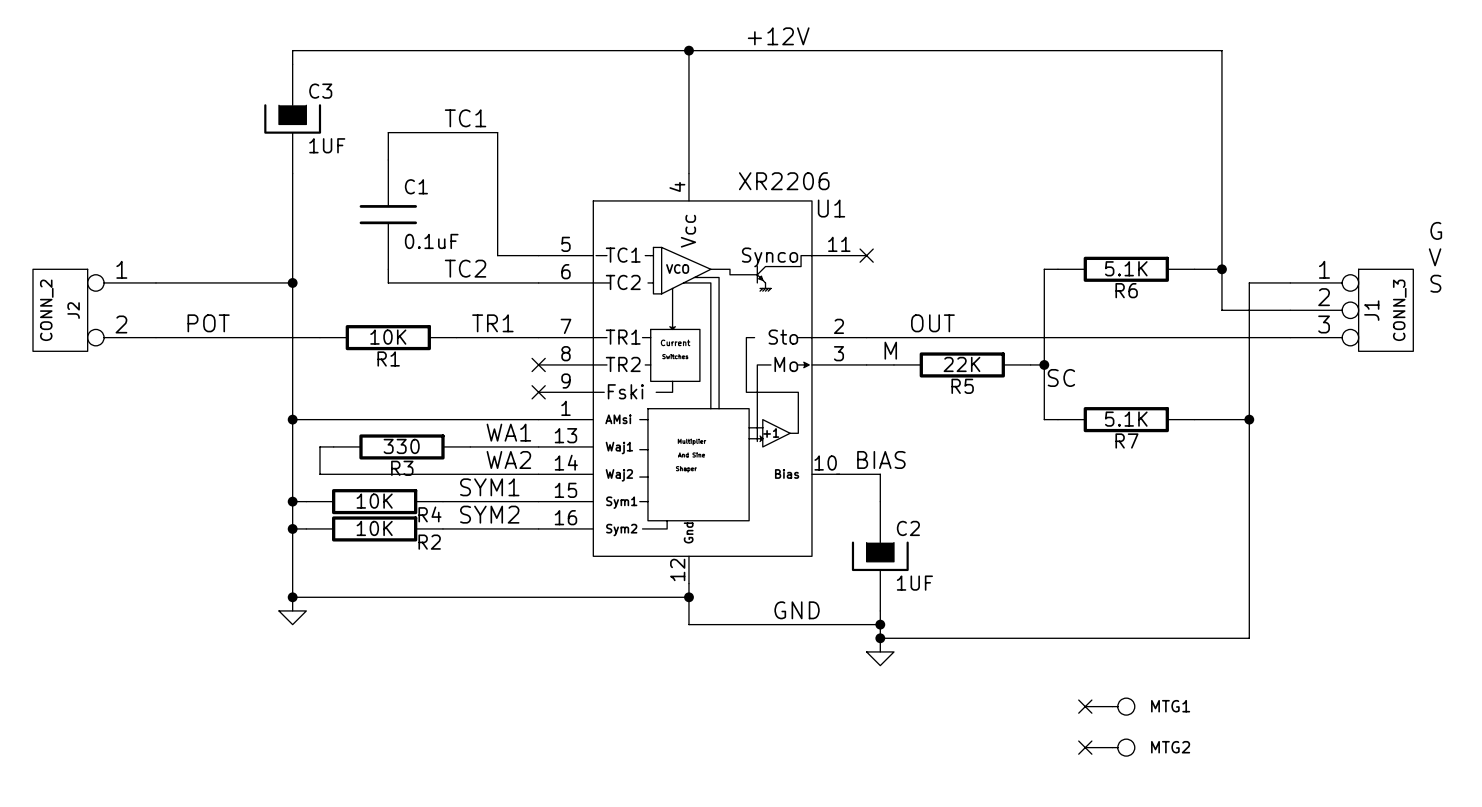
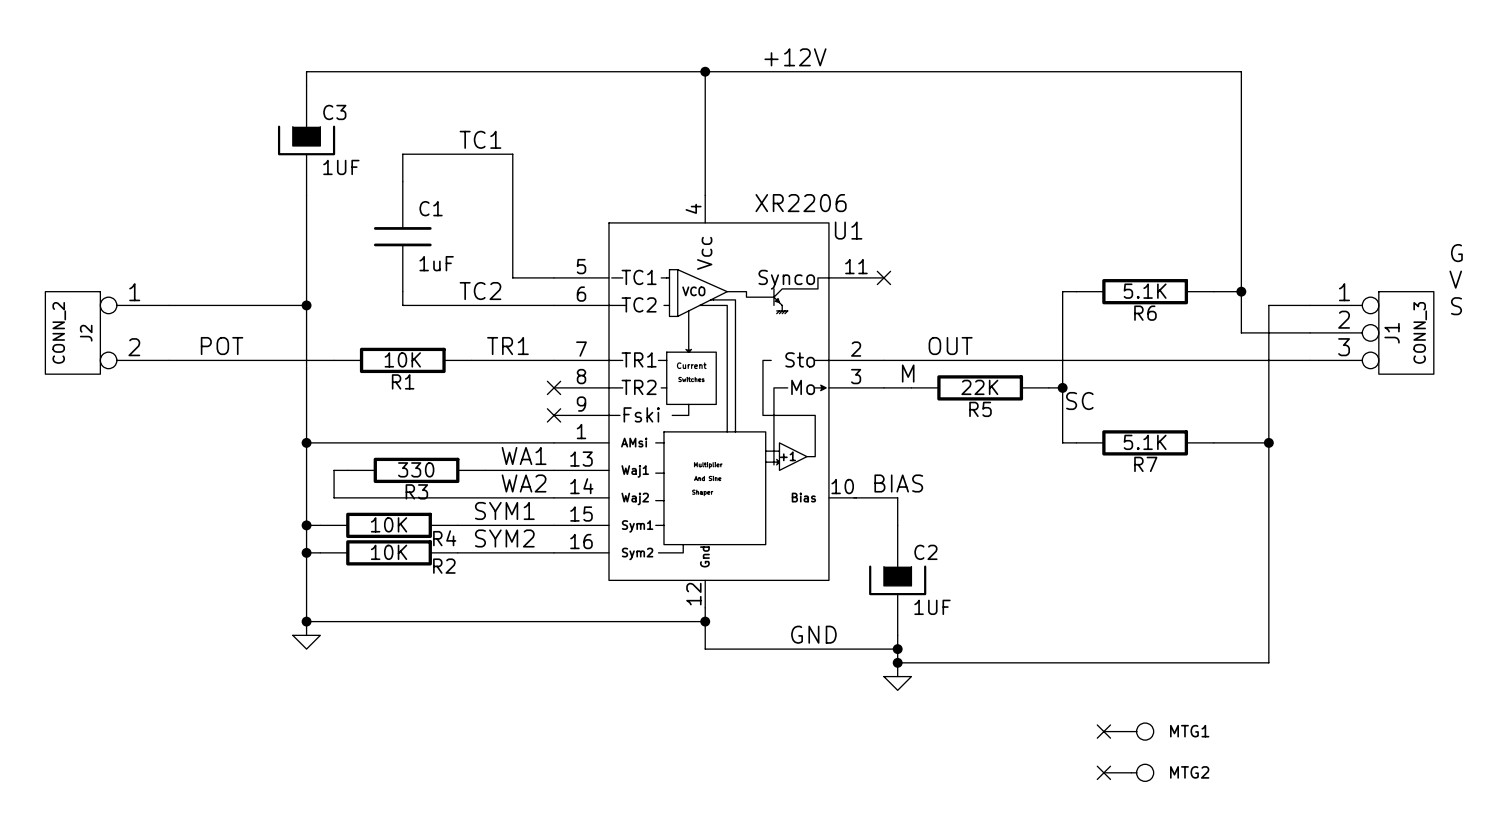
C1 value: 0.1uF (431, 241) -> 1uF (436, 263)

